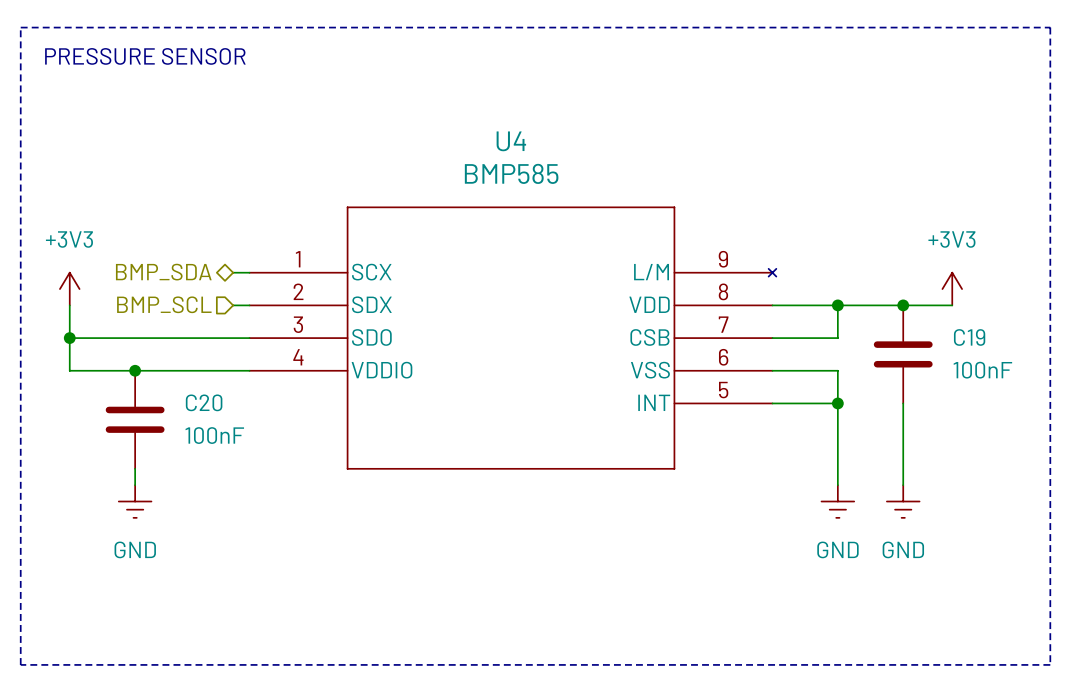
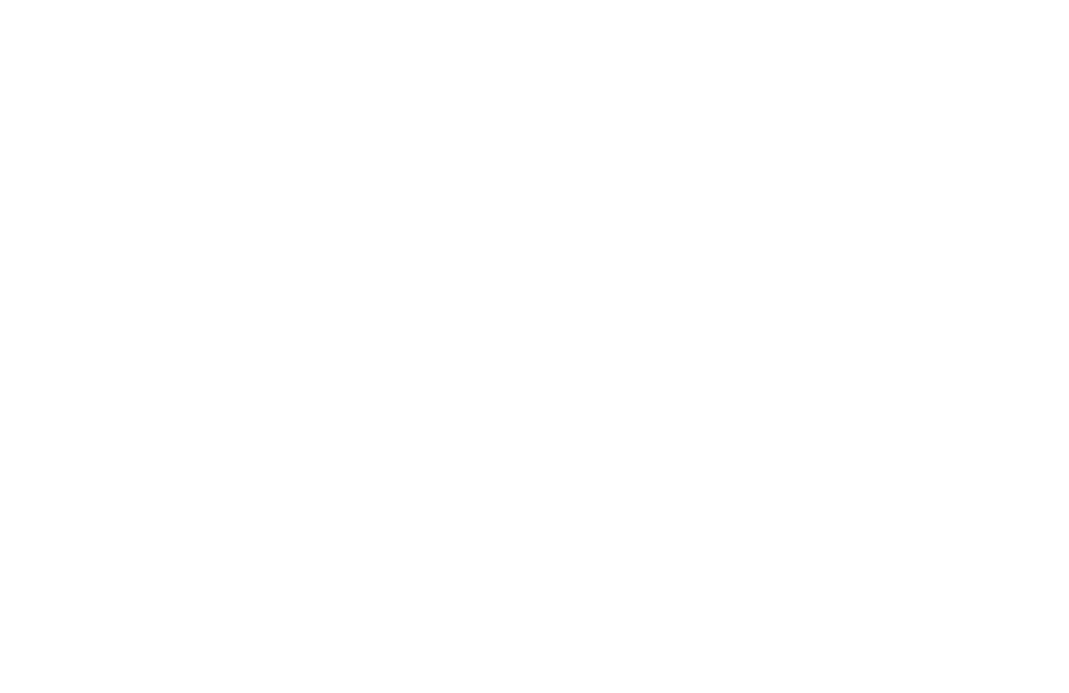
line: (20, 27) (1050, 27) (1050, 664) (20, 664) (20, 27) -> none
text: PRESSURE SENSOR (145, 56) -> none
hierarchical label: BMP_SDA (163, 272) -> none
wire: (233, 272) (249, 272) -> none
power symbol: +3V3 (69, 289) -> none
power symbol: +3V3 (952, 289) -> none
hierarchical label: BMP_SCL (164, 304) -> none
wire: (69, 305) (69, 370) (249, 370) -> none
wire: (233, 305) (249, 305) -> none
wire: (772, 305) (952, 305) -> none
wire: (837, 305) (837, 338) (772, 338) -> none
junction: (837, 305) -> none
junction: (903, 305) -> none
wire: (69, 338) (249, 338) -> none
junction: (69, 338) -> none
U4: BMP585 (512, 338) -> none
C19: 100nF (903, 354) -> none
junction: (135, 370) -> none
wire: (772, 370) (837, 370) (837, 485) -> none
wire: (772, 403) (837, 403) -> none
junction: (837, 403) -> none
wire: (903, 403) (903, 485) -> none
C20: 100nF (135, 419) -> none
wire: (135, 468) (135, 485) -> none
power symbol: GND (135, 501) -> none
power symbol: GND (837, 501) -> none
power symbol: GND (903, 501) -> none

